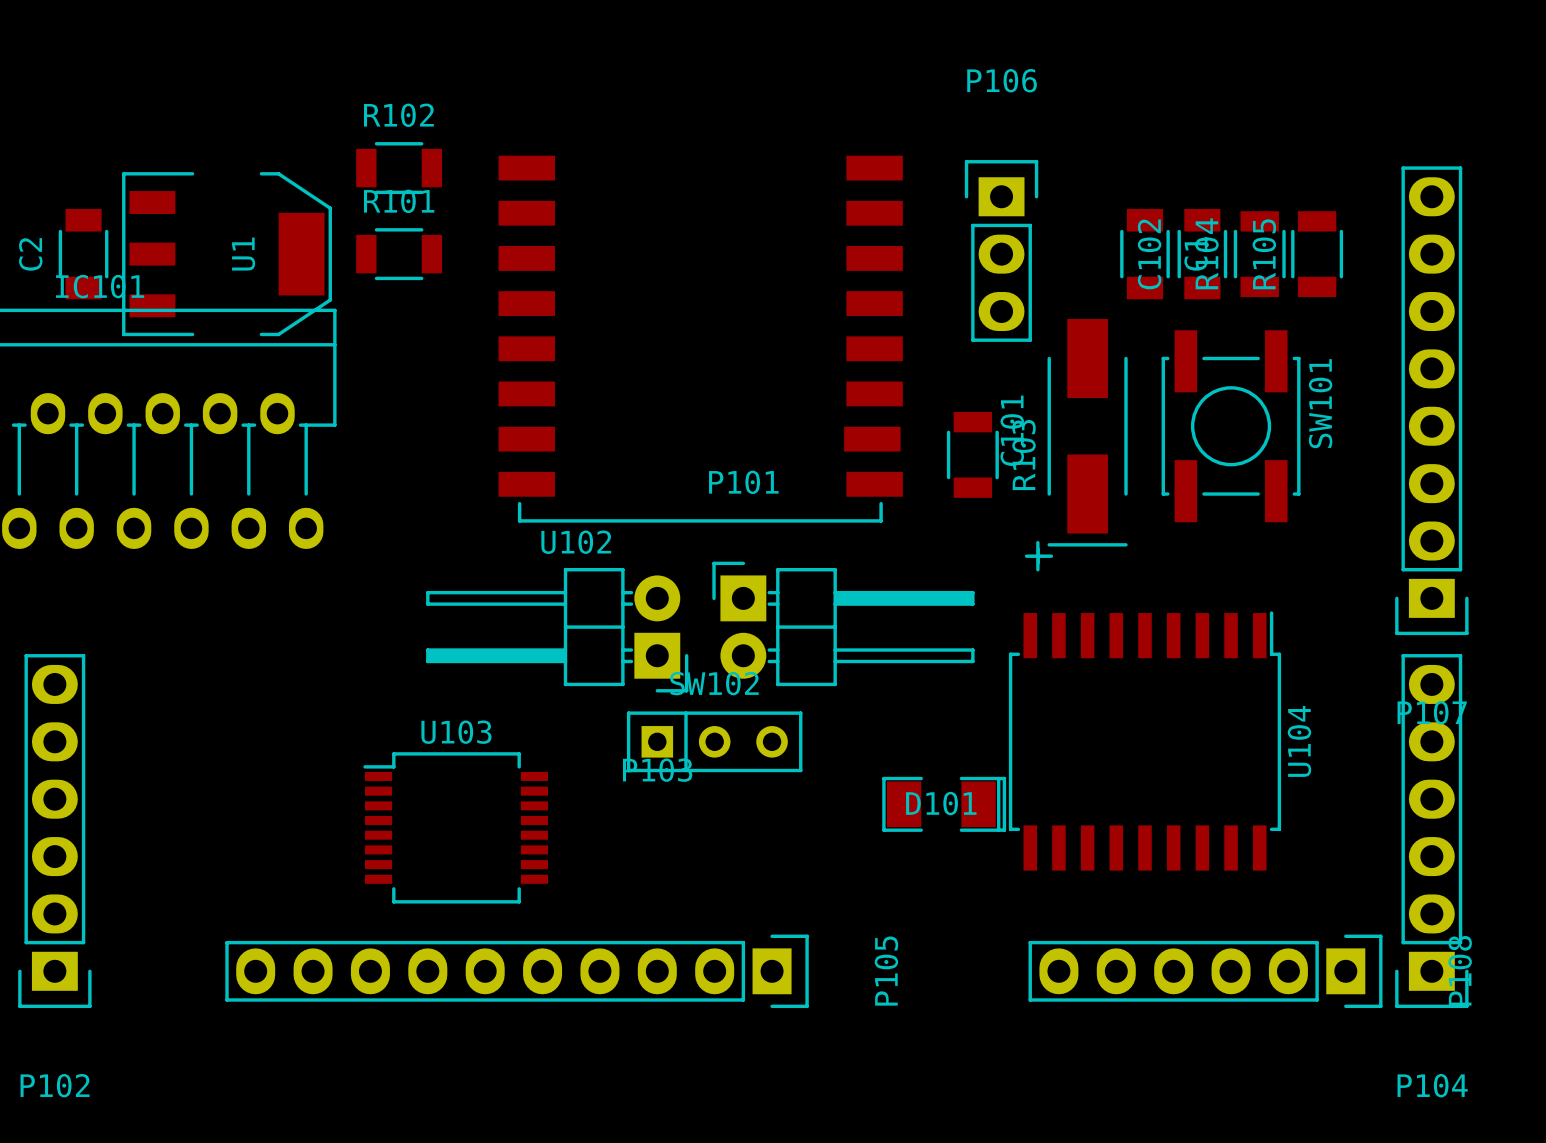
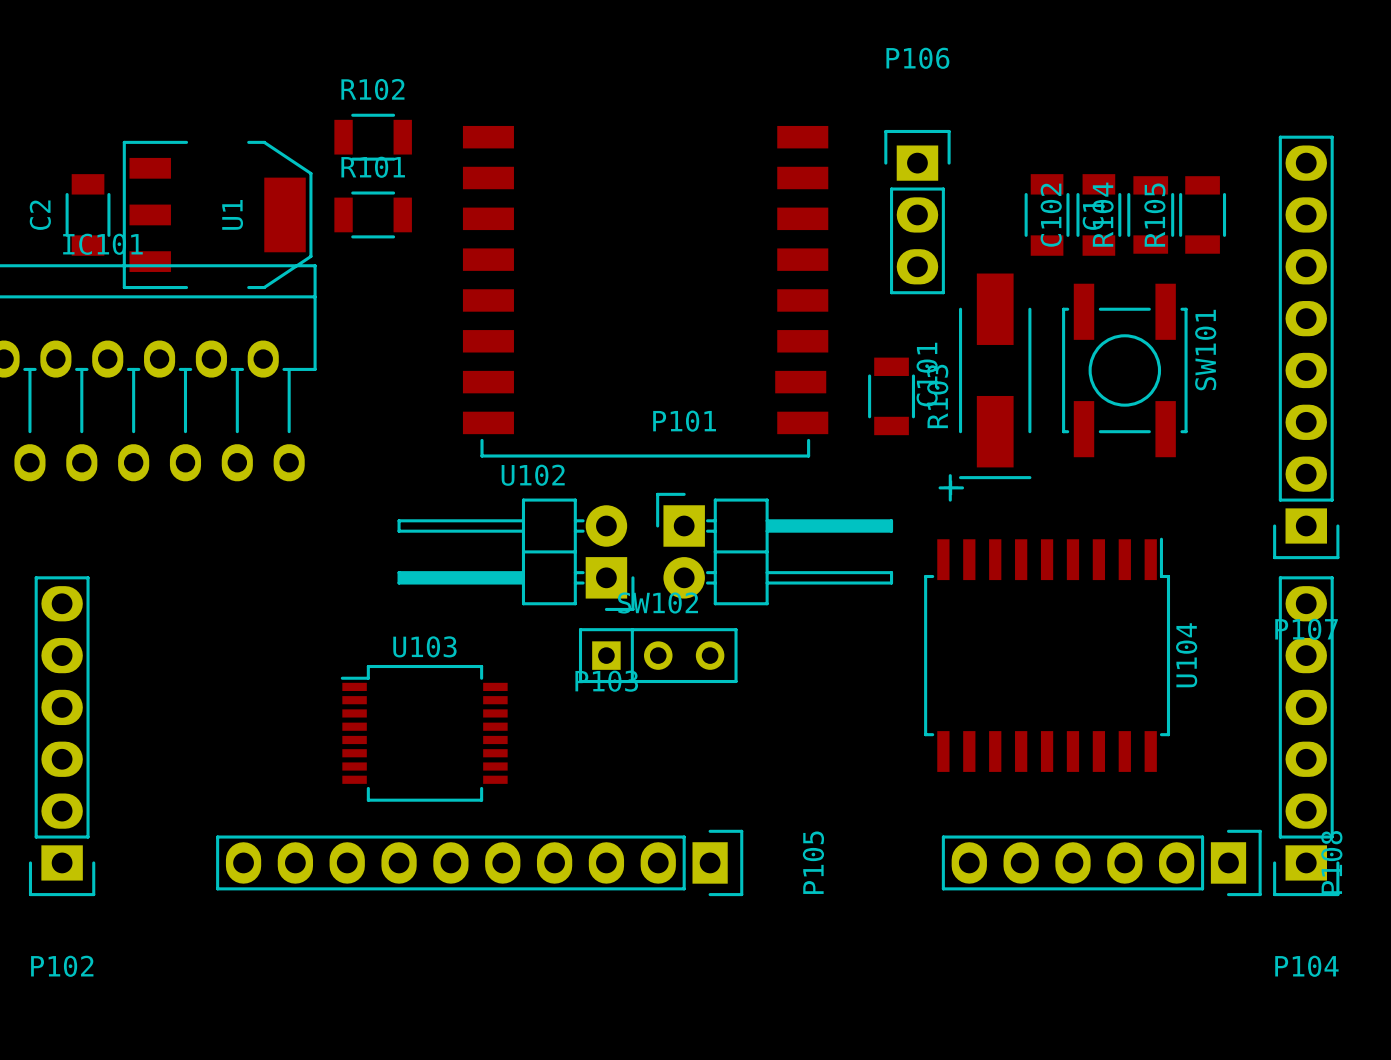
D101: (944, 804) -> none

